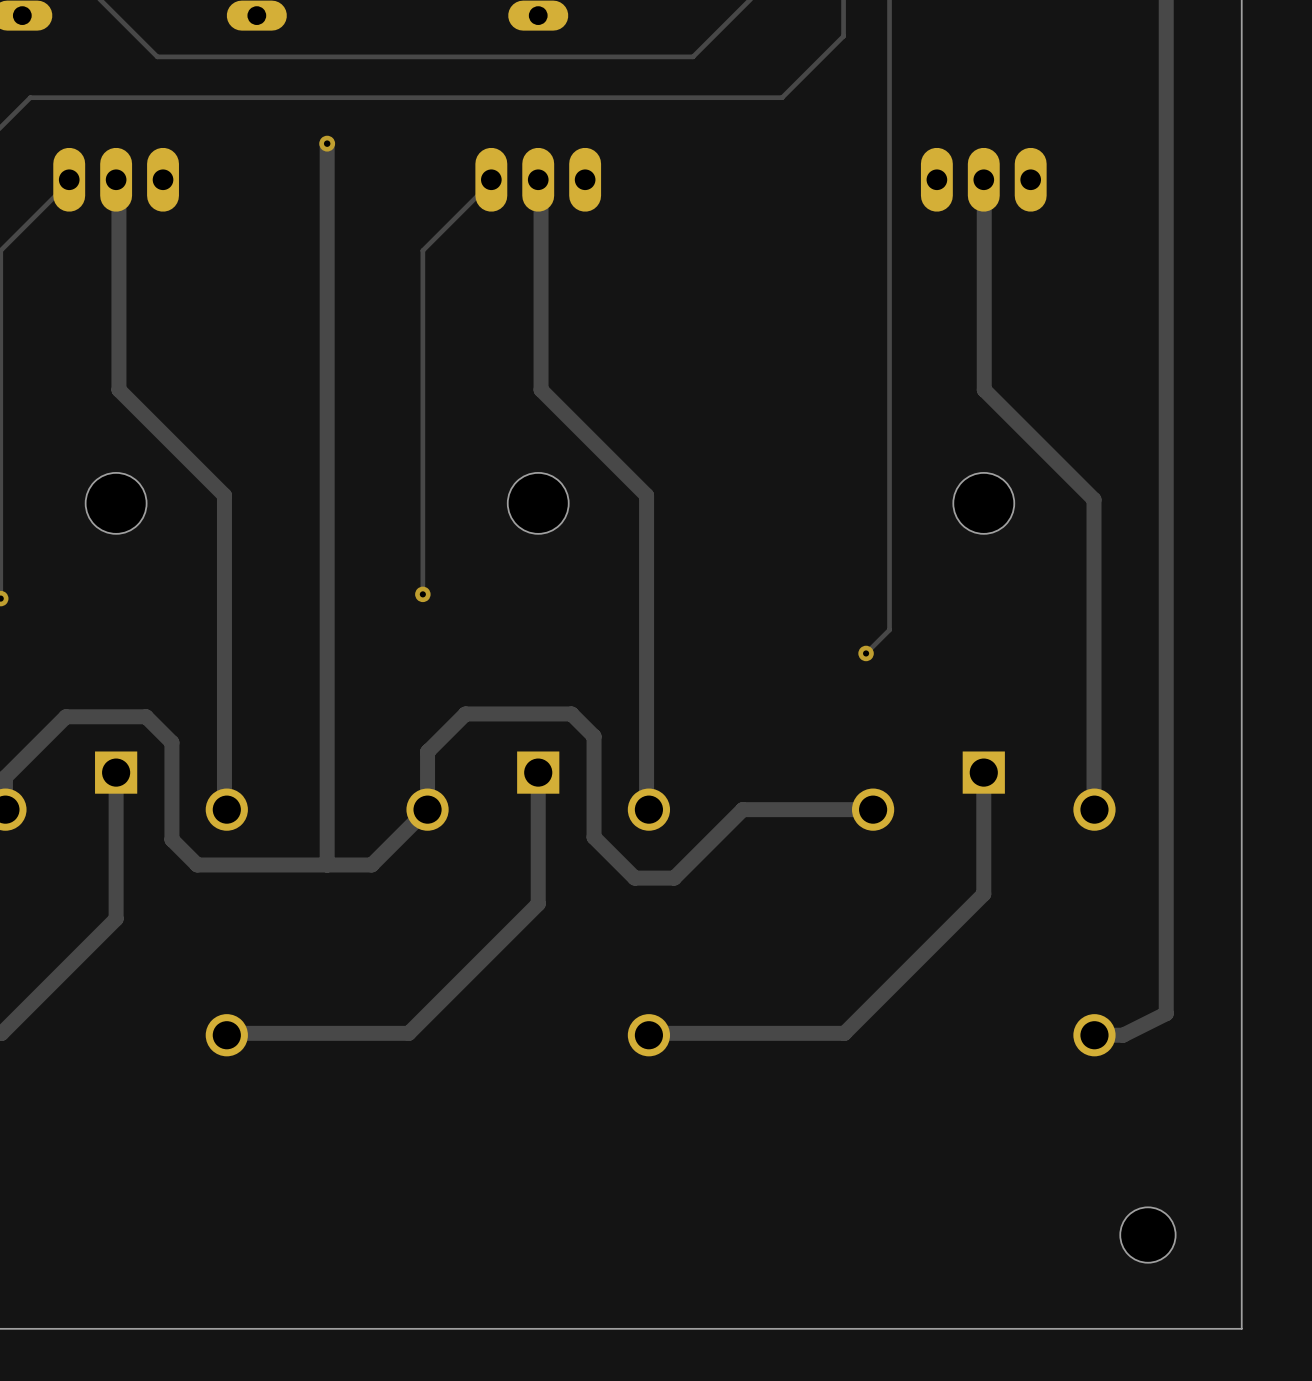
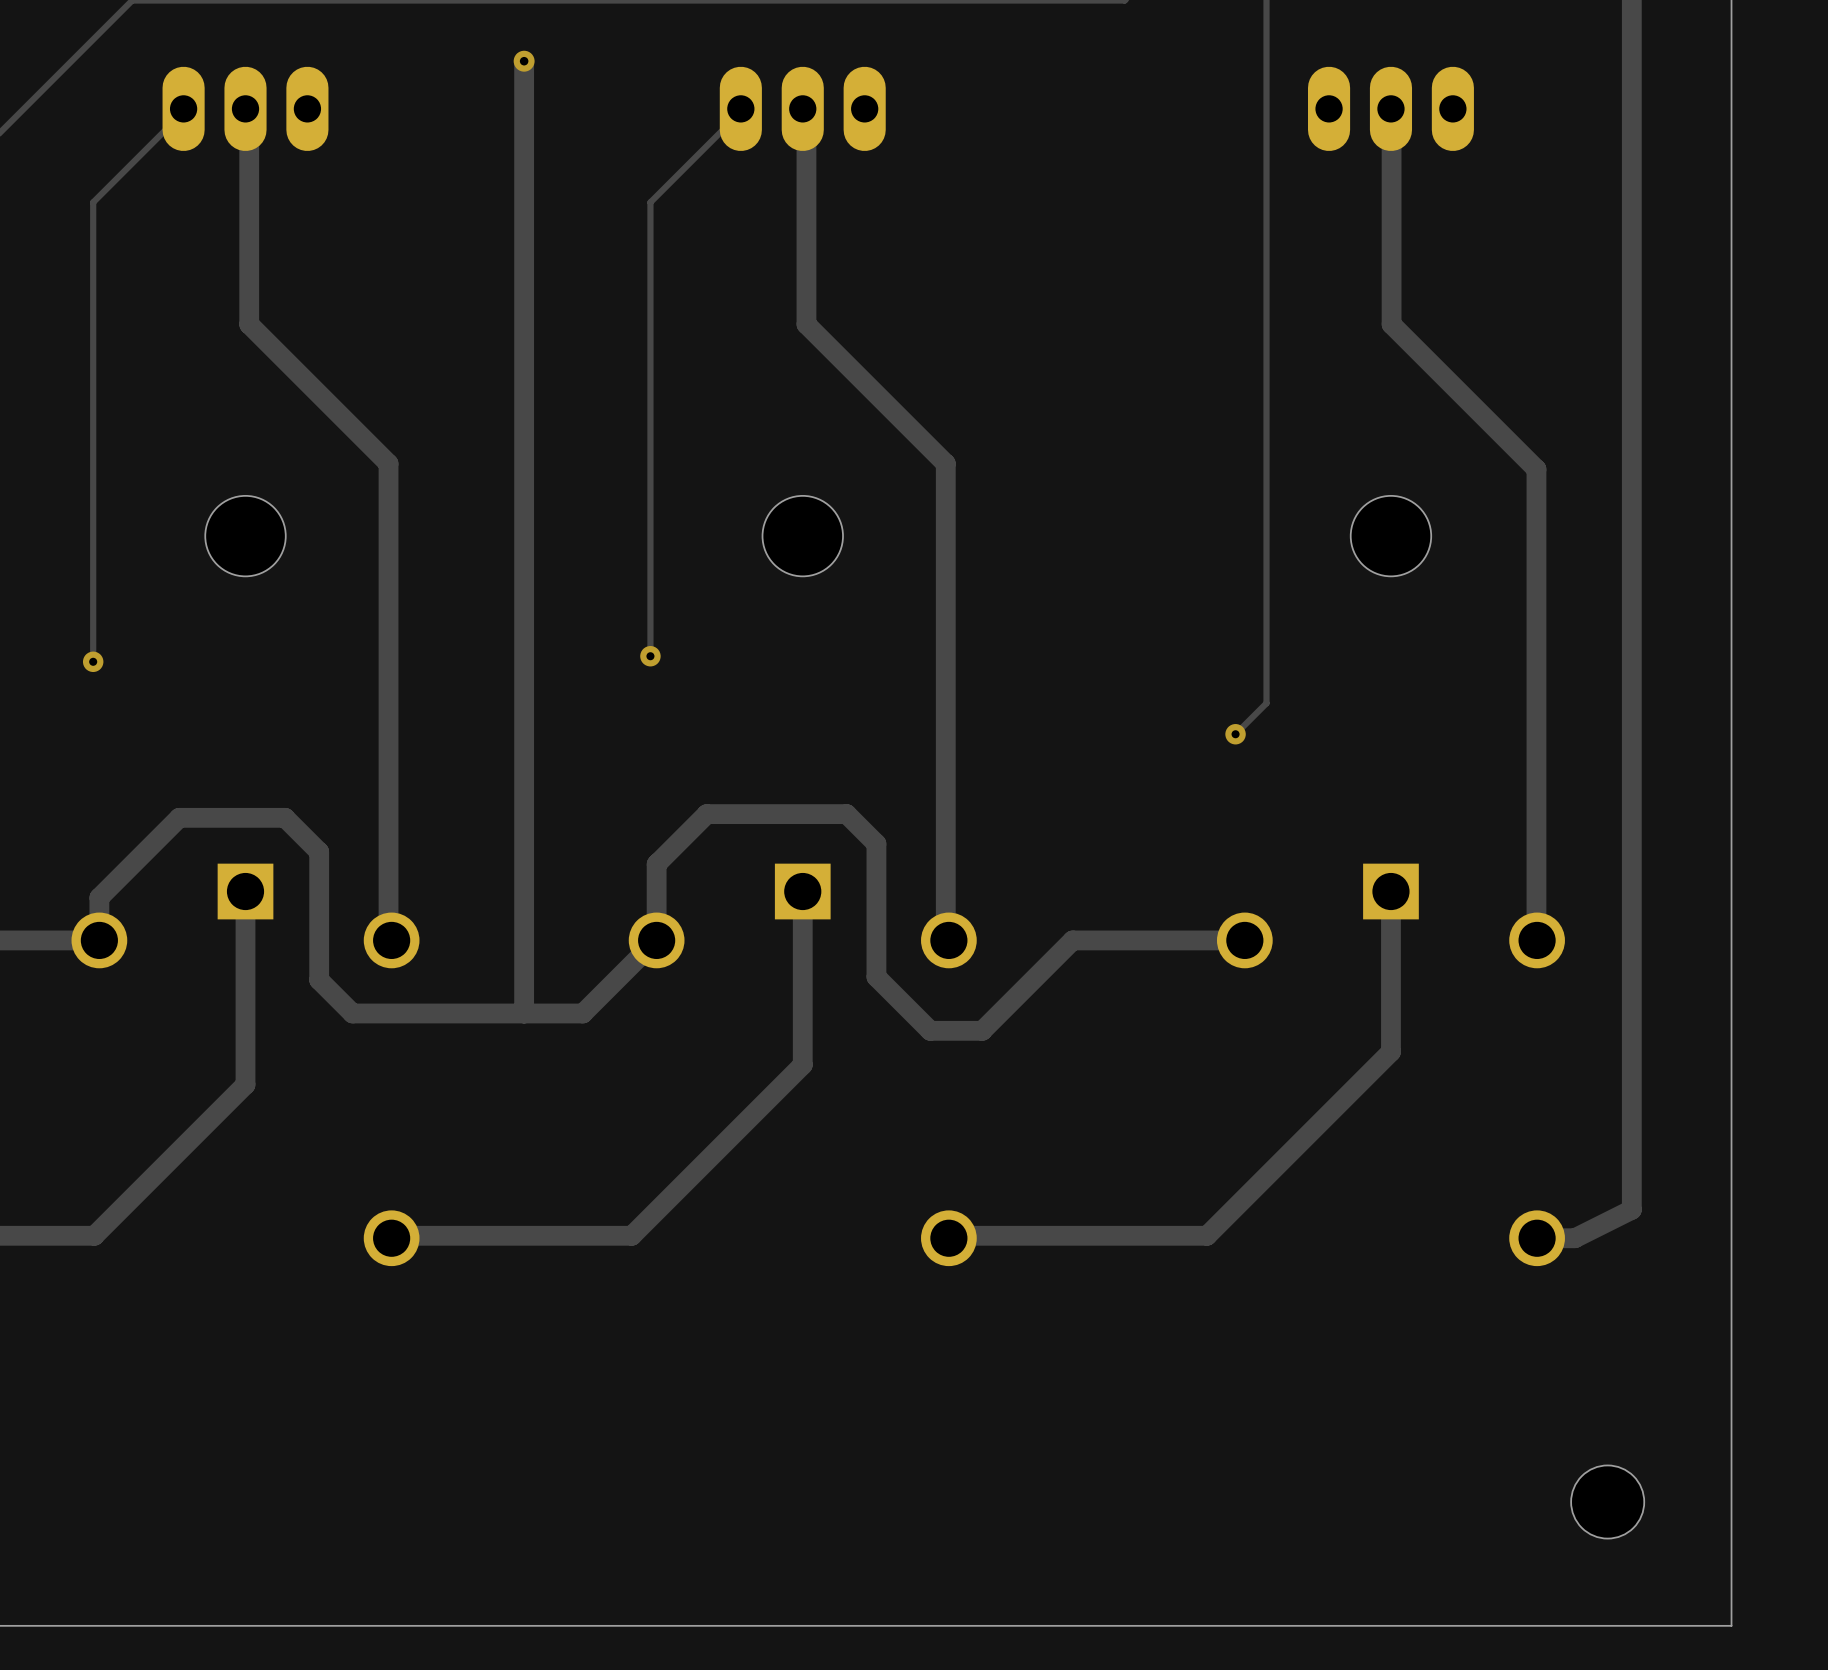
track: (118, 342) (118, 389) (224, 495) -> (249, 324) (388, 463) (388, 525)
track: (541, 342) (541, 389) (646, 495) -> (806, 324) (945, 463) (945, 525)
track: (984, 342) (984, 389) (1094, 499) -> (1391, 324) (1536, 469) (1536, 531)

